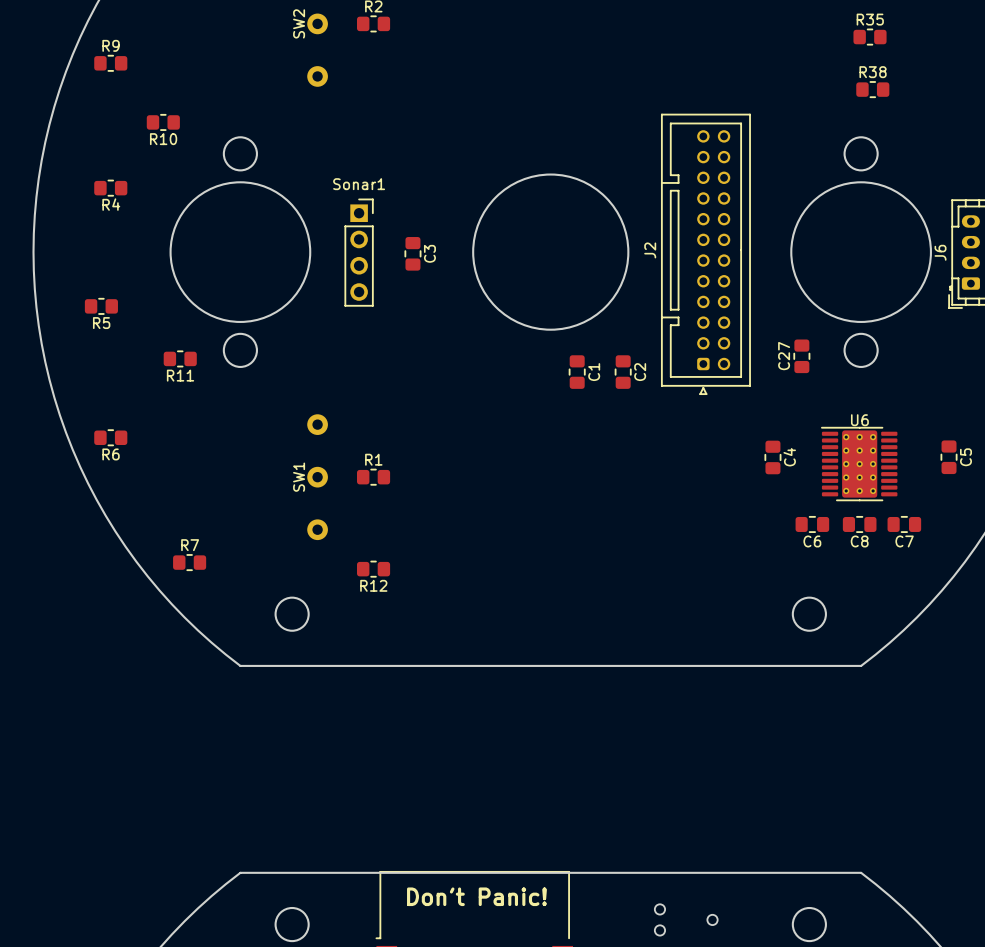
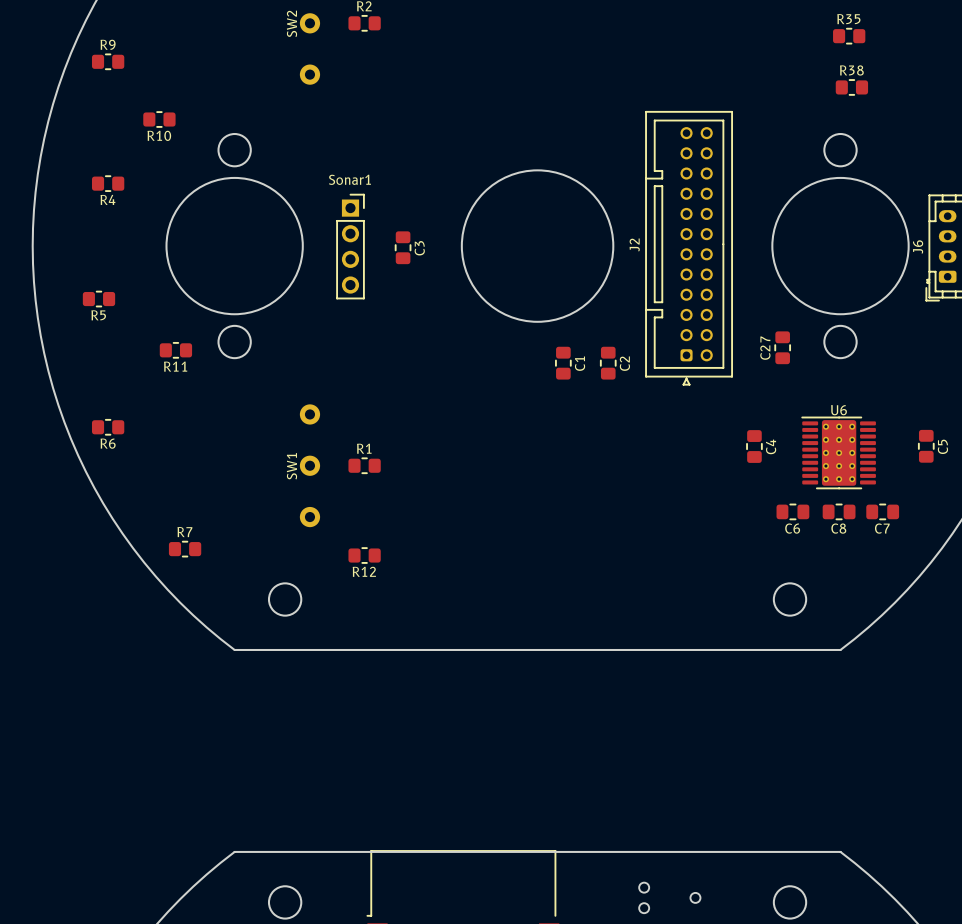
text: Don't Panic! (476, 896) -> none

